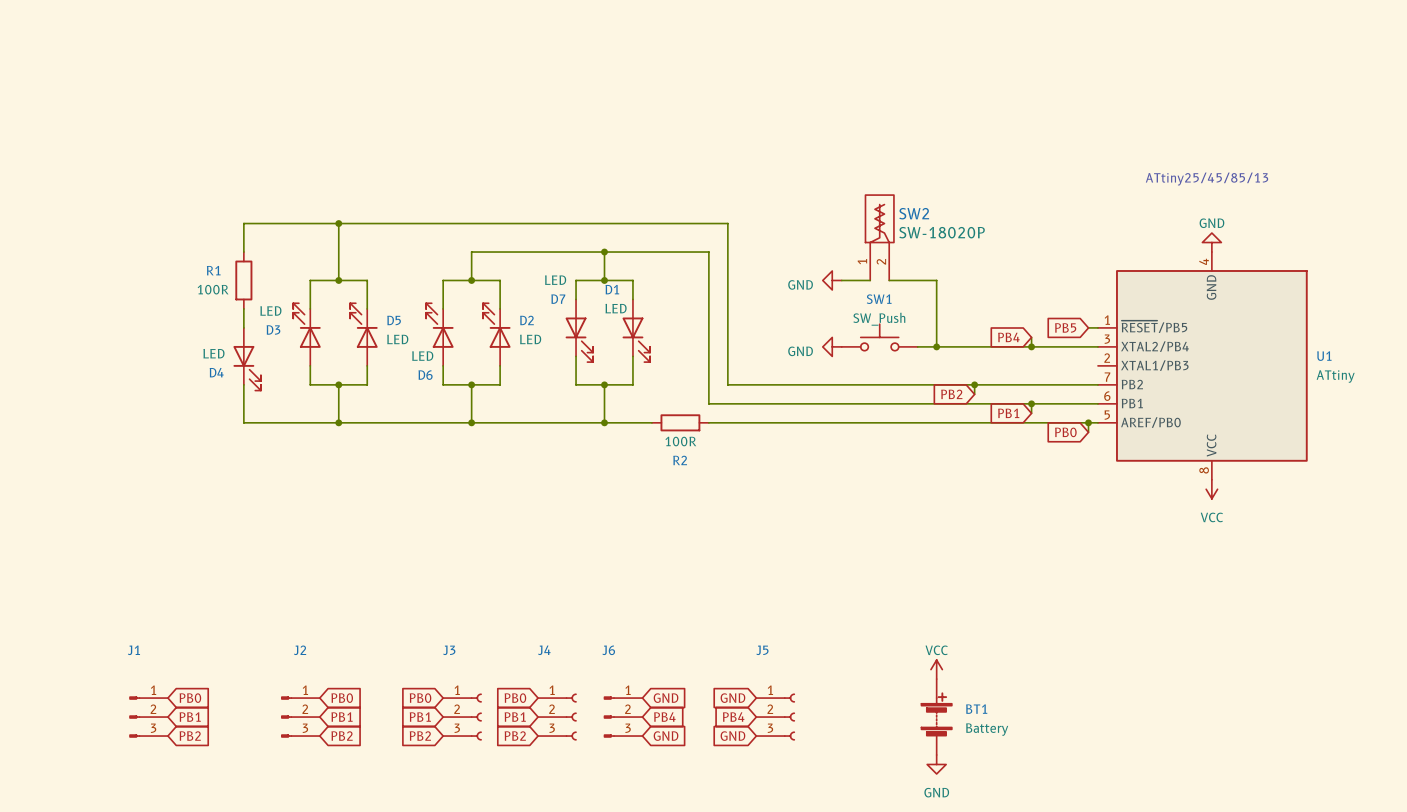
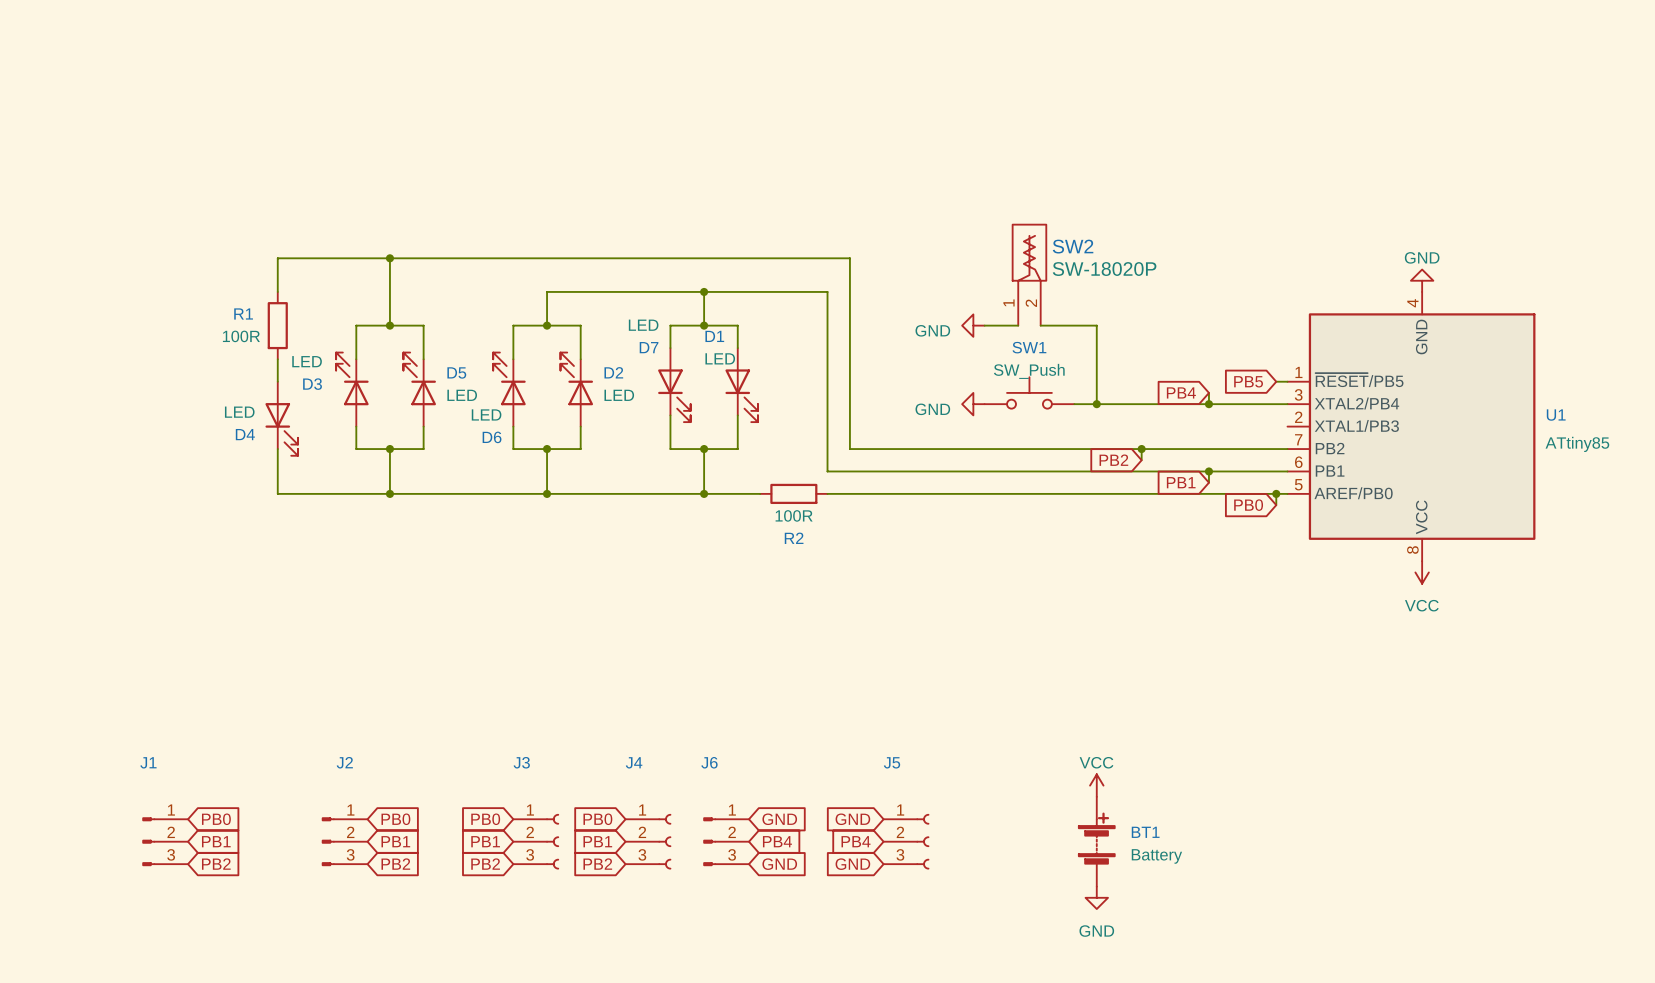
text: ATtiny25/45/85/13 (1207, 179) -> none
U1 value: ATtiny (1335, 376) -> ATtiny85 (1577, 444)

